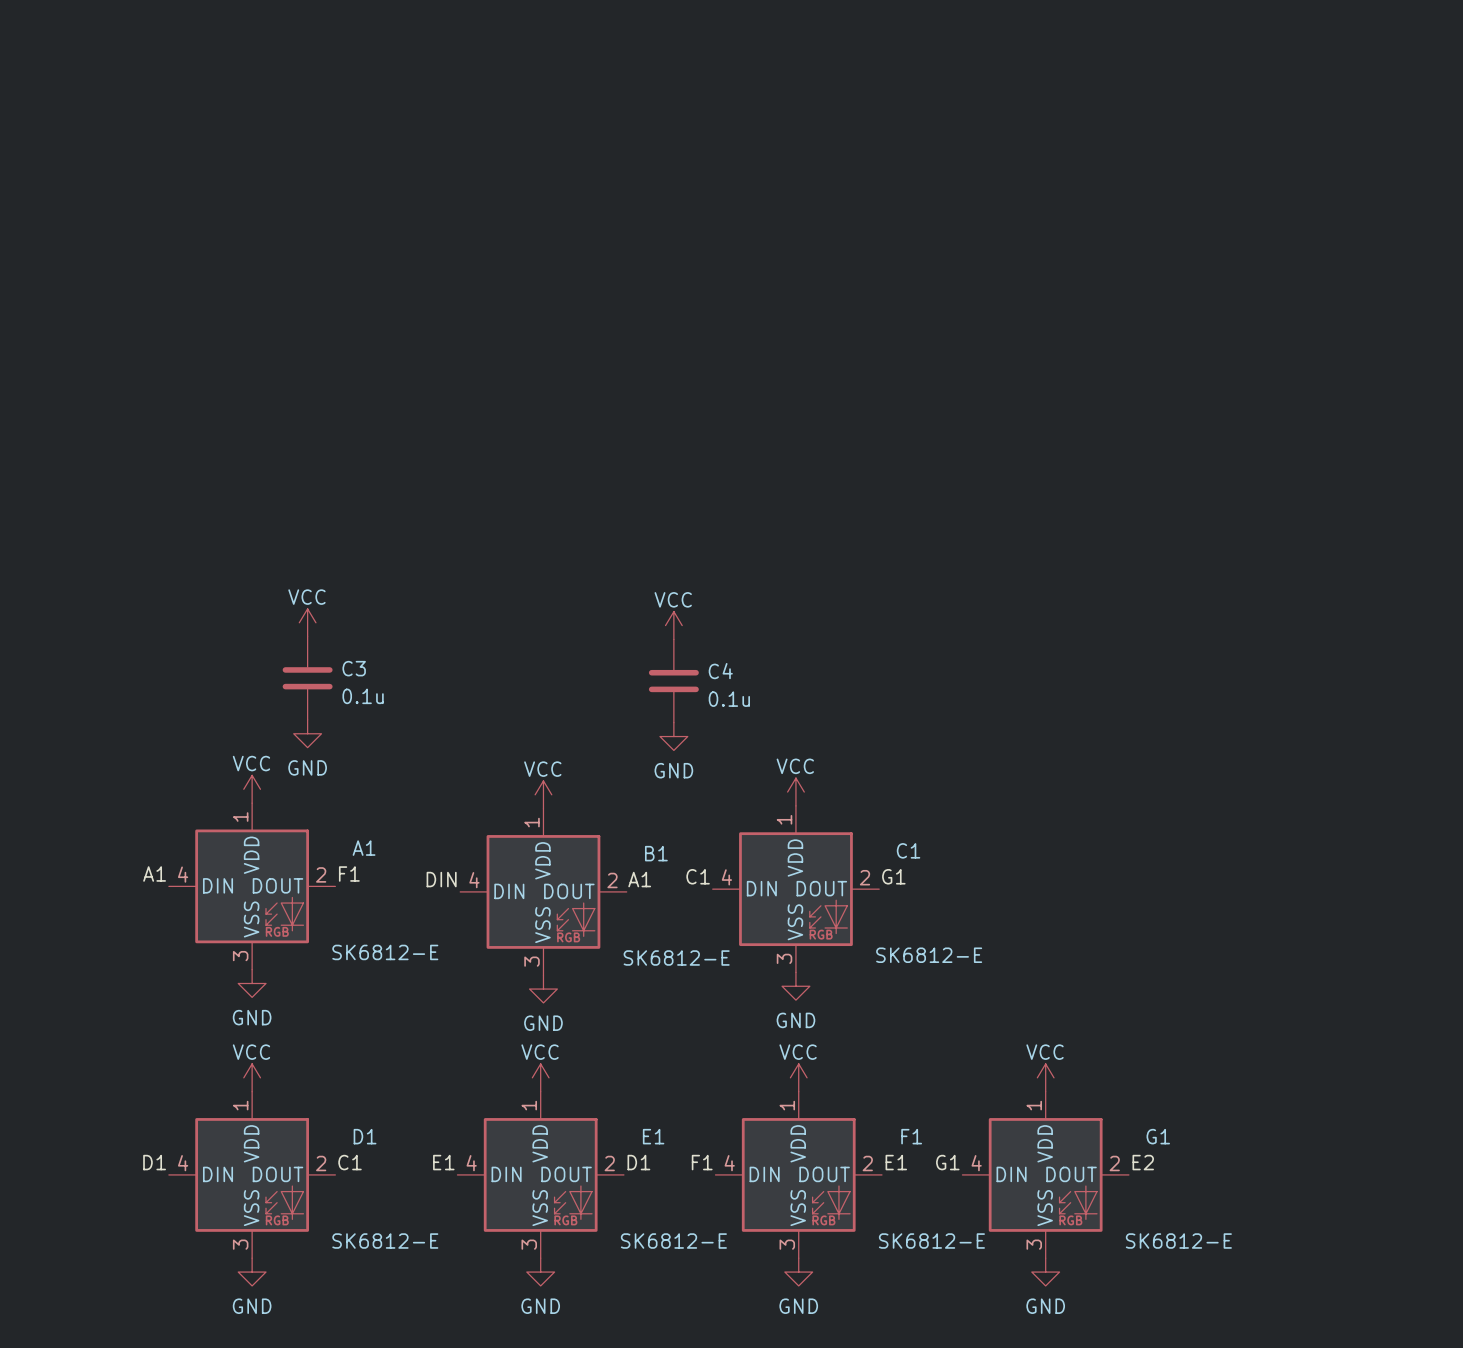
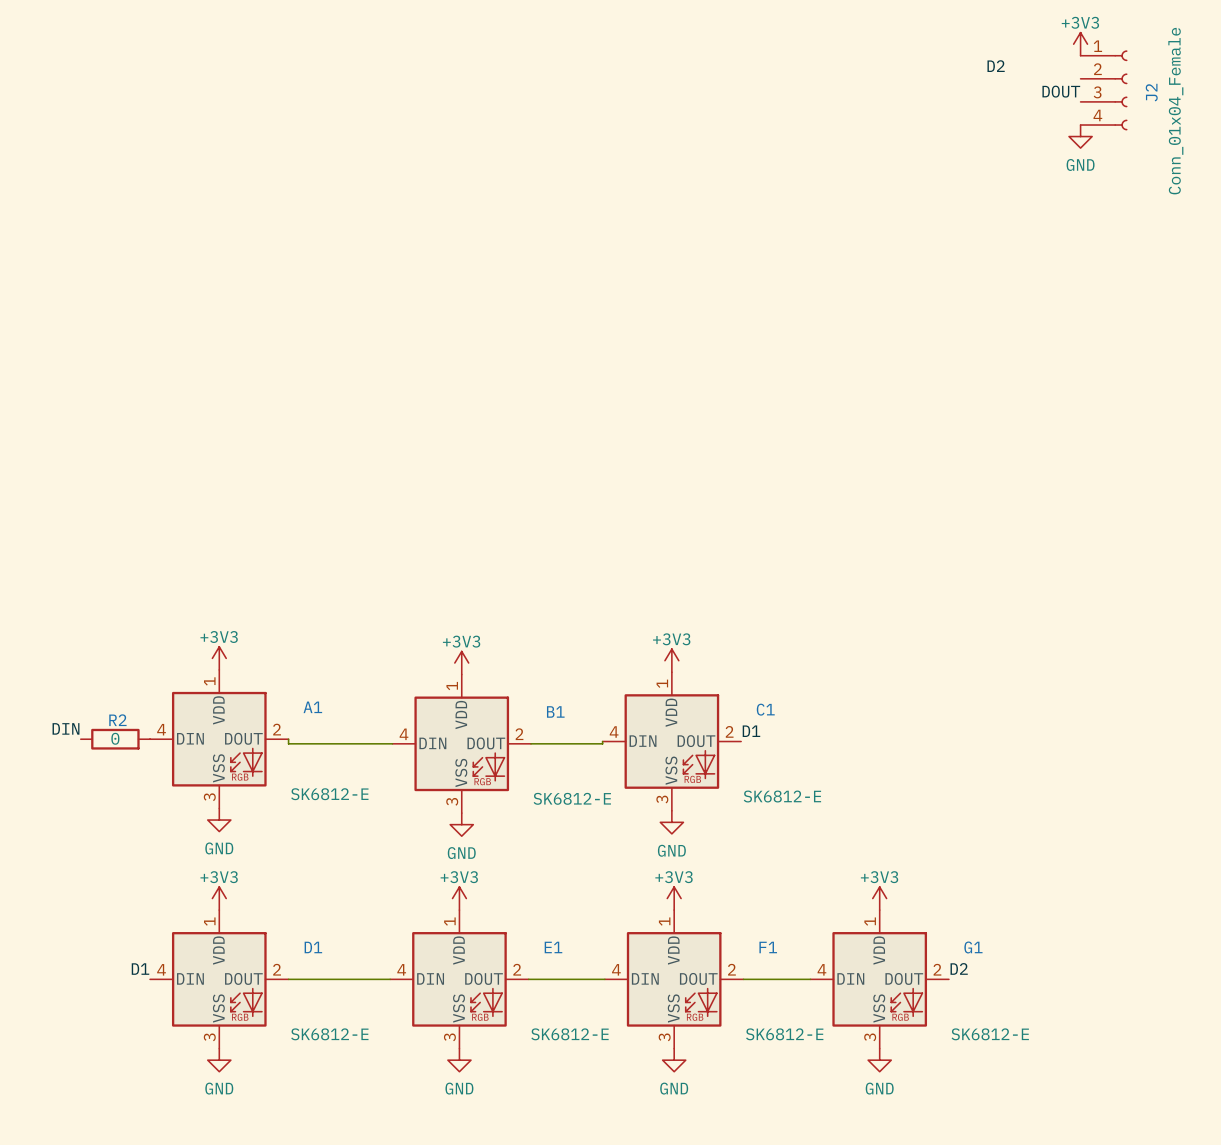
power symbol: none -> +3V3 (1080, 44)
label: none -> D2 (996, 66)
J2: none -> Conn_01x04_Female (1104, 90)
label: none -> DOUT (1061, 91)
power symbol: none -> GND (1080, 136)
power symbol: VCC (307, 622) -> none
power symbol: VCC (673, 625) -> none
C3: 0.1u (307, 678) -> none
C4: 0.1u (673, 681) -> none
power symbol: GND (307, 733) -> none
power symbol: GND (673, 736) -> none
power symbol: VCC (252, 789) -> +3V3 (219, 658)
power symbol: VCC (795, 792) -> +3V3 (671, 660)
power symbol: VCC (543, 794) -> +3V3 (461, 663)
label: none -> DIN (65, 728)
label: A1 (154, 874) -> none
label: F1 (349, 874) -> none
label: C1 (698, 876) -> none
label: G1 (893, 876) -> D1 (751, 731)
label: DIN (441, 879) -> none
label: A1 (639, 879) -> none
R2: none -> 0 (115, 739)
wire: none -> (288, 739) (288, 743) (392, 743)
wire: none -> (602, 741) (602, 743) (531, 743)
power symbol: VCC (252, 1077) -> +3V3 (219, 898)
power symbol: VCC (540, 1077) -> +3V3 (459, 898)
power symbol: VCC (798, 1077) -> +3V3 (674, 898)
power symbol: VCC (1045, 1077) -> +3V3 (879, 898)
label: C1 (350, 1162) -> none
label: E1 (443, 1162) -> none
label: D1 (638, 1162) -> none
label: F1 (702, 1162) -> none
label: E1 (896, 1162) -> none
label: G1 (947, 1162) -> none
label: E2 (1143, 1162) -> D2 (959, 968)
wire: none -> (288, 979) (390, 979)
wire: none -> (528, 979) (604, 979)
wire: none -> (743, 979) (810, 979)

